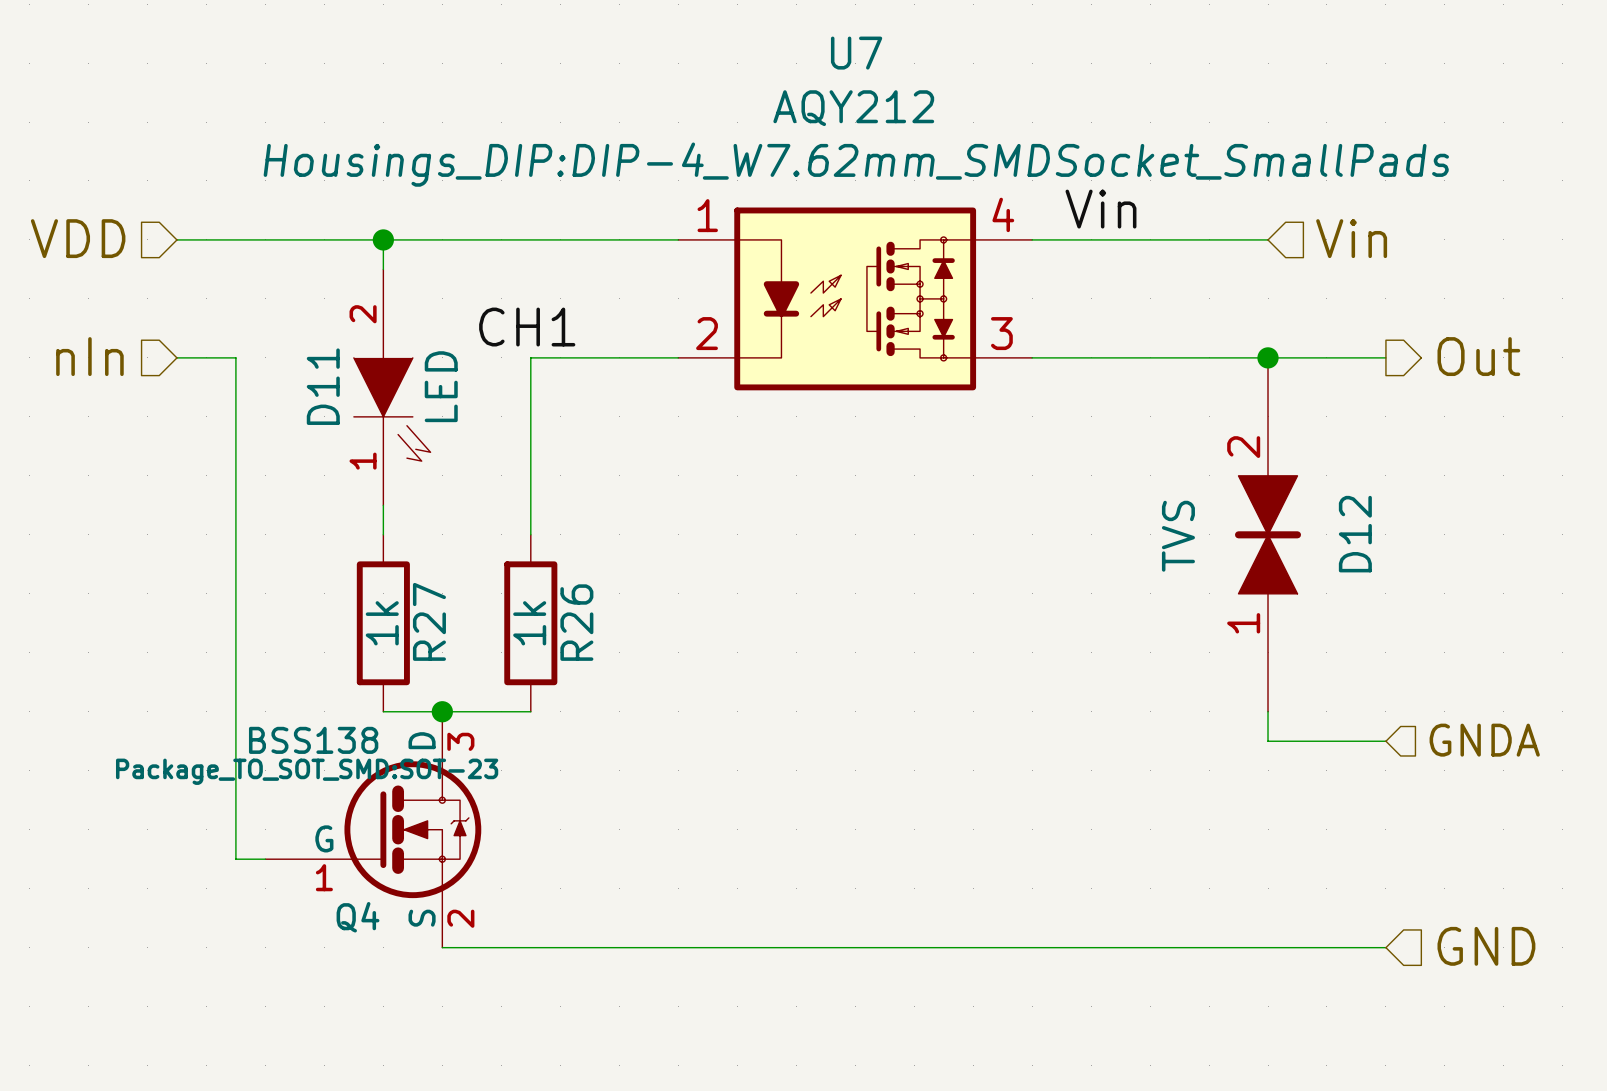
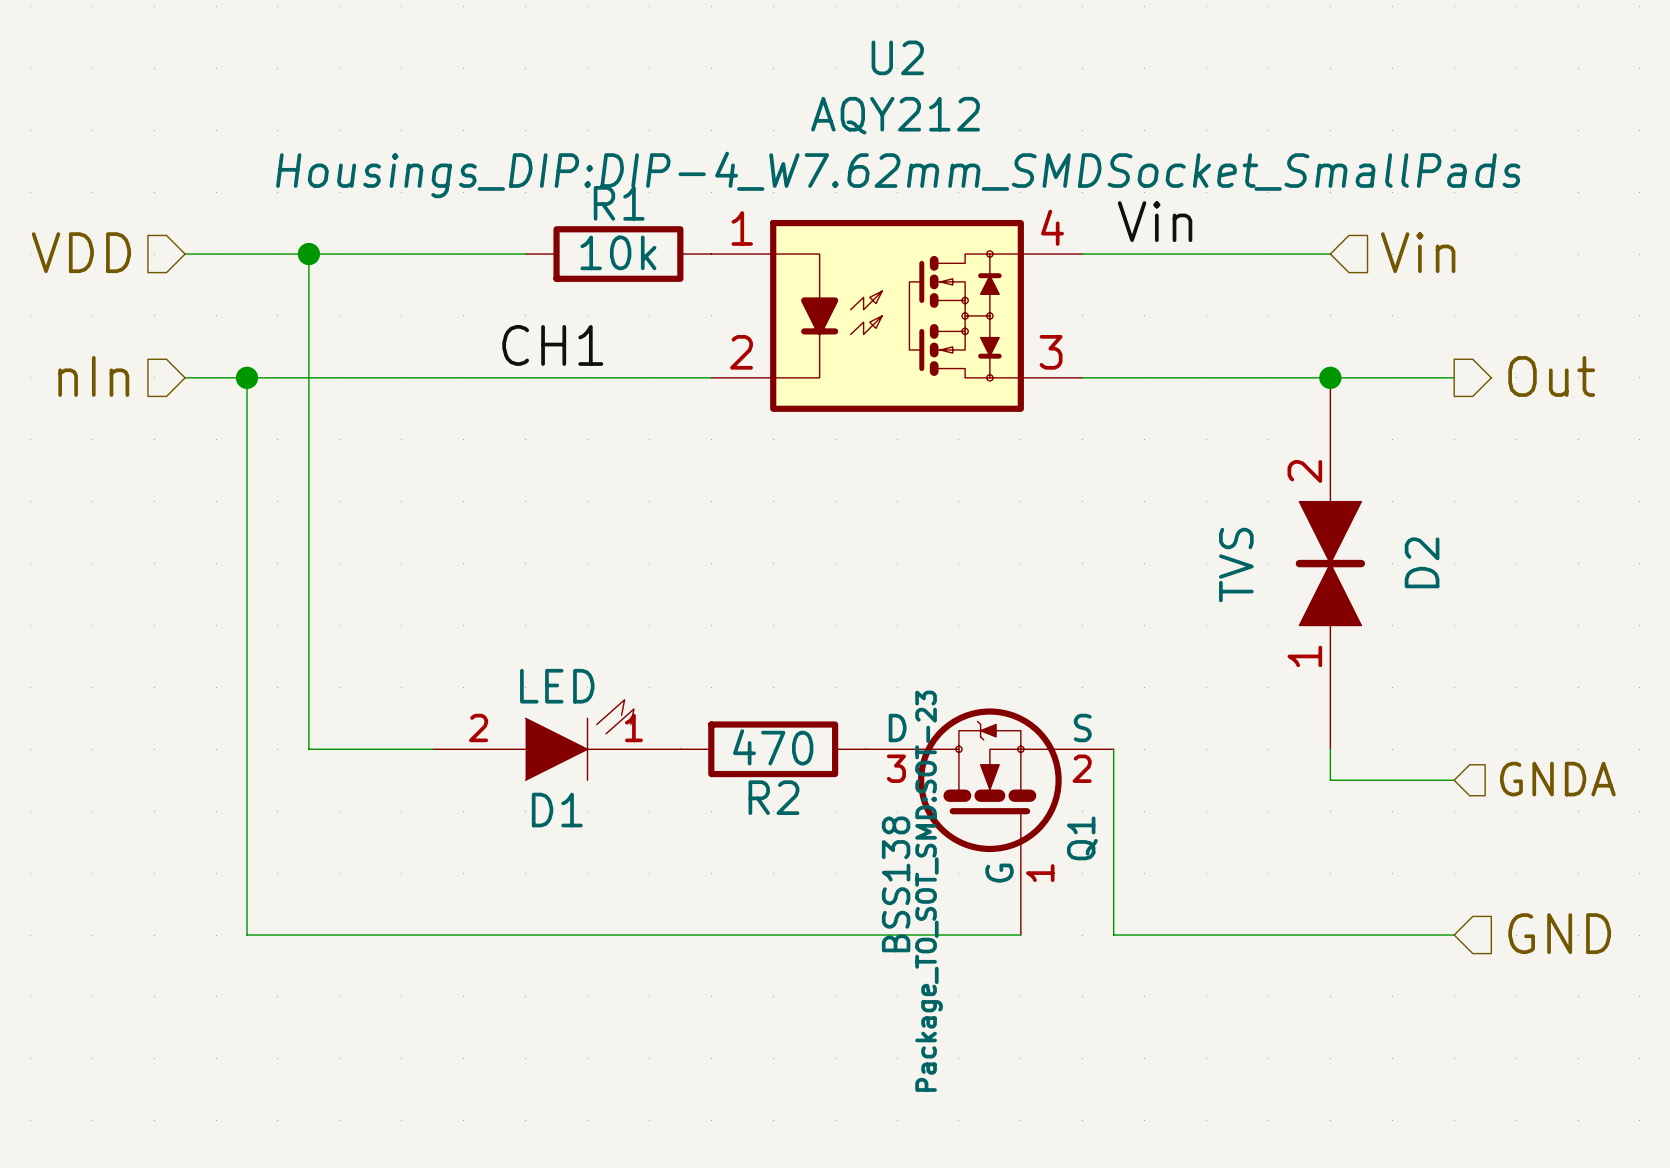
U7 name: U7 (856, 53) -> U2 (897, 57)
wire: none -> (308, 254) (308, 749) (401, 749)
wire: (383, 239) (383, 269) -> none
junction position: (383, 239) -> (308, 254)
wire: (501, 239) (678, 239) -> none
R1: none -> 10k (618, 254)
junction: none -> (247, 377)
wire: (530, 357) (530, 534) -> (556, 377) (247, 377)
D11: LED (392, 387) -> none
wire: (383, 505) (383, 534) -> none
D12 name: D12 (1355, 534) -> D2 (1422, 562)
R27: 1k (383, 623) -> none
R26: 1k (530, 623) -> none
D1: none -> LED (556, 740)
junction: (442, 711) -> none
R2: none -> 470 (773, 749)
wire: none -> (1113, 749) (1113, 935) (1454, 935)
Q1: none -> BSS138 (989, 821)
Q4: BSS138 (373, 829) -> none
wire: (235, 859) (265, 859) -> (247, 904) (247, 935) (1020, 935)
hierarchical label position: GND (1486, 946) -> GND (1559, 933)
wire: (442, 947) (1385, 947) -> none

